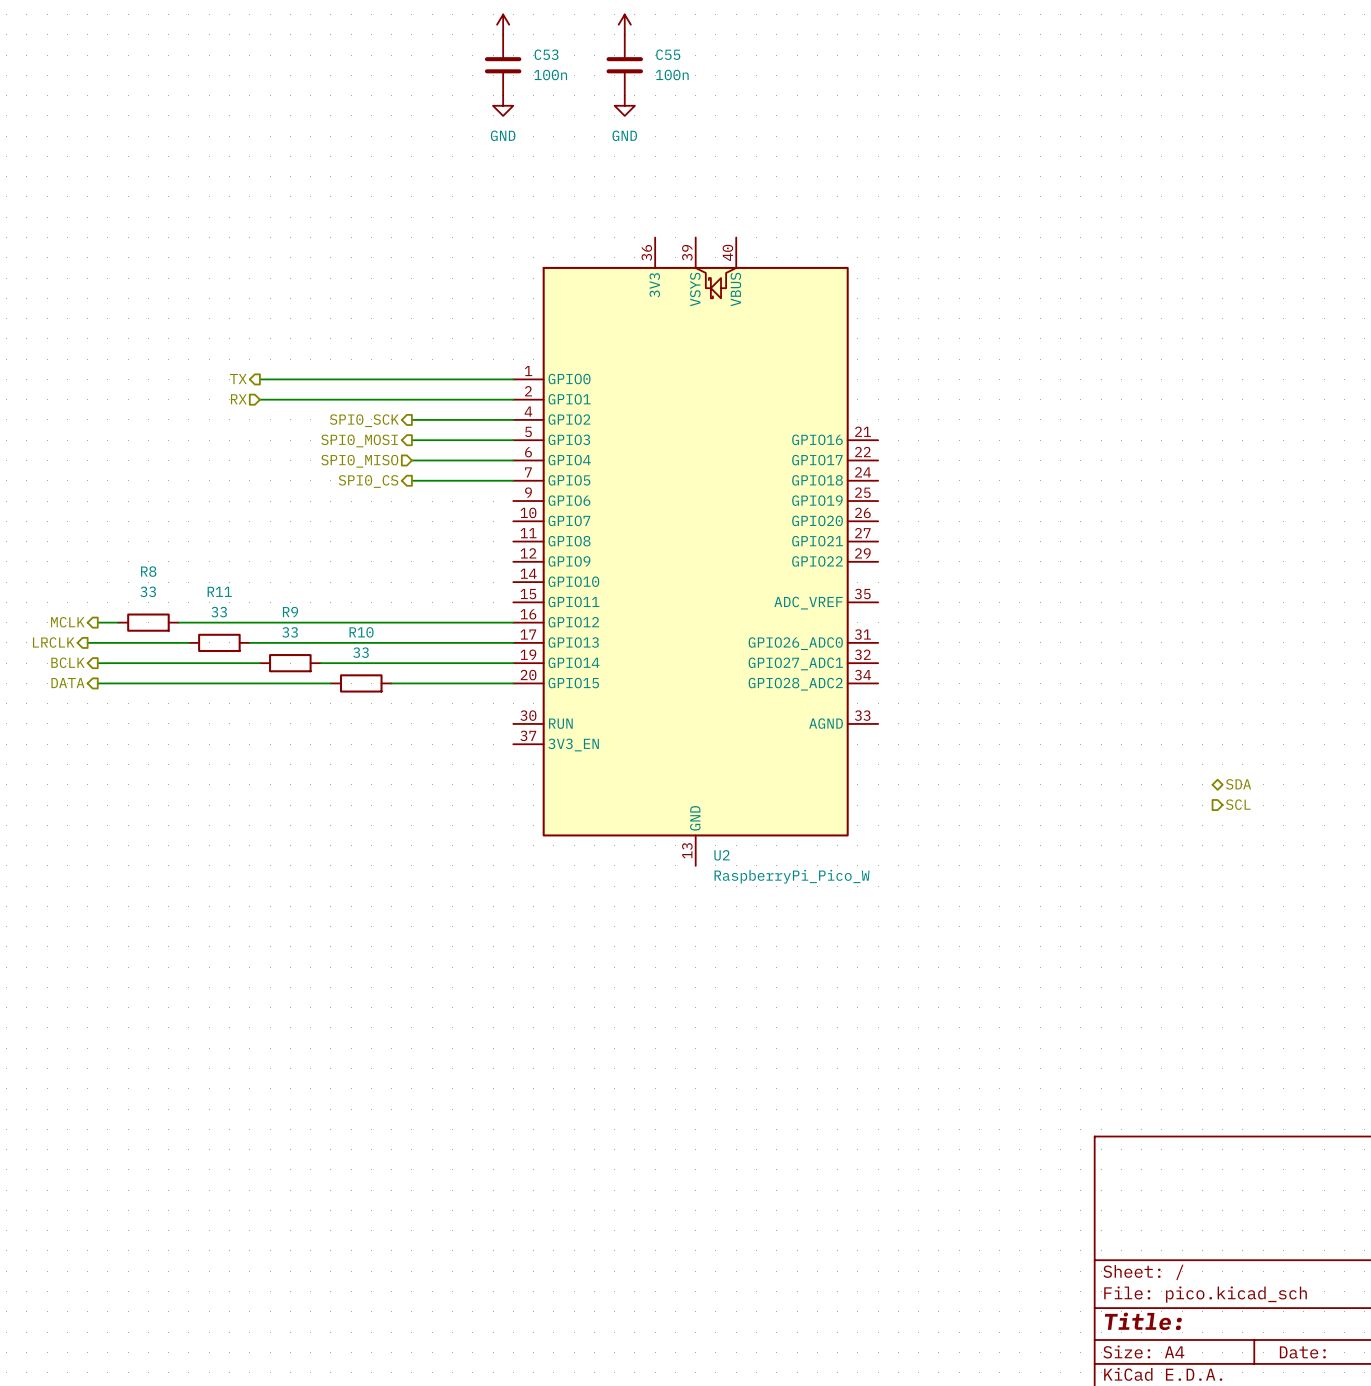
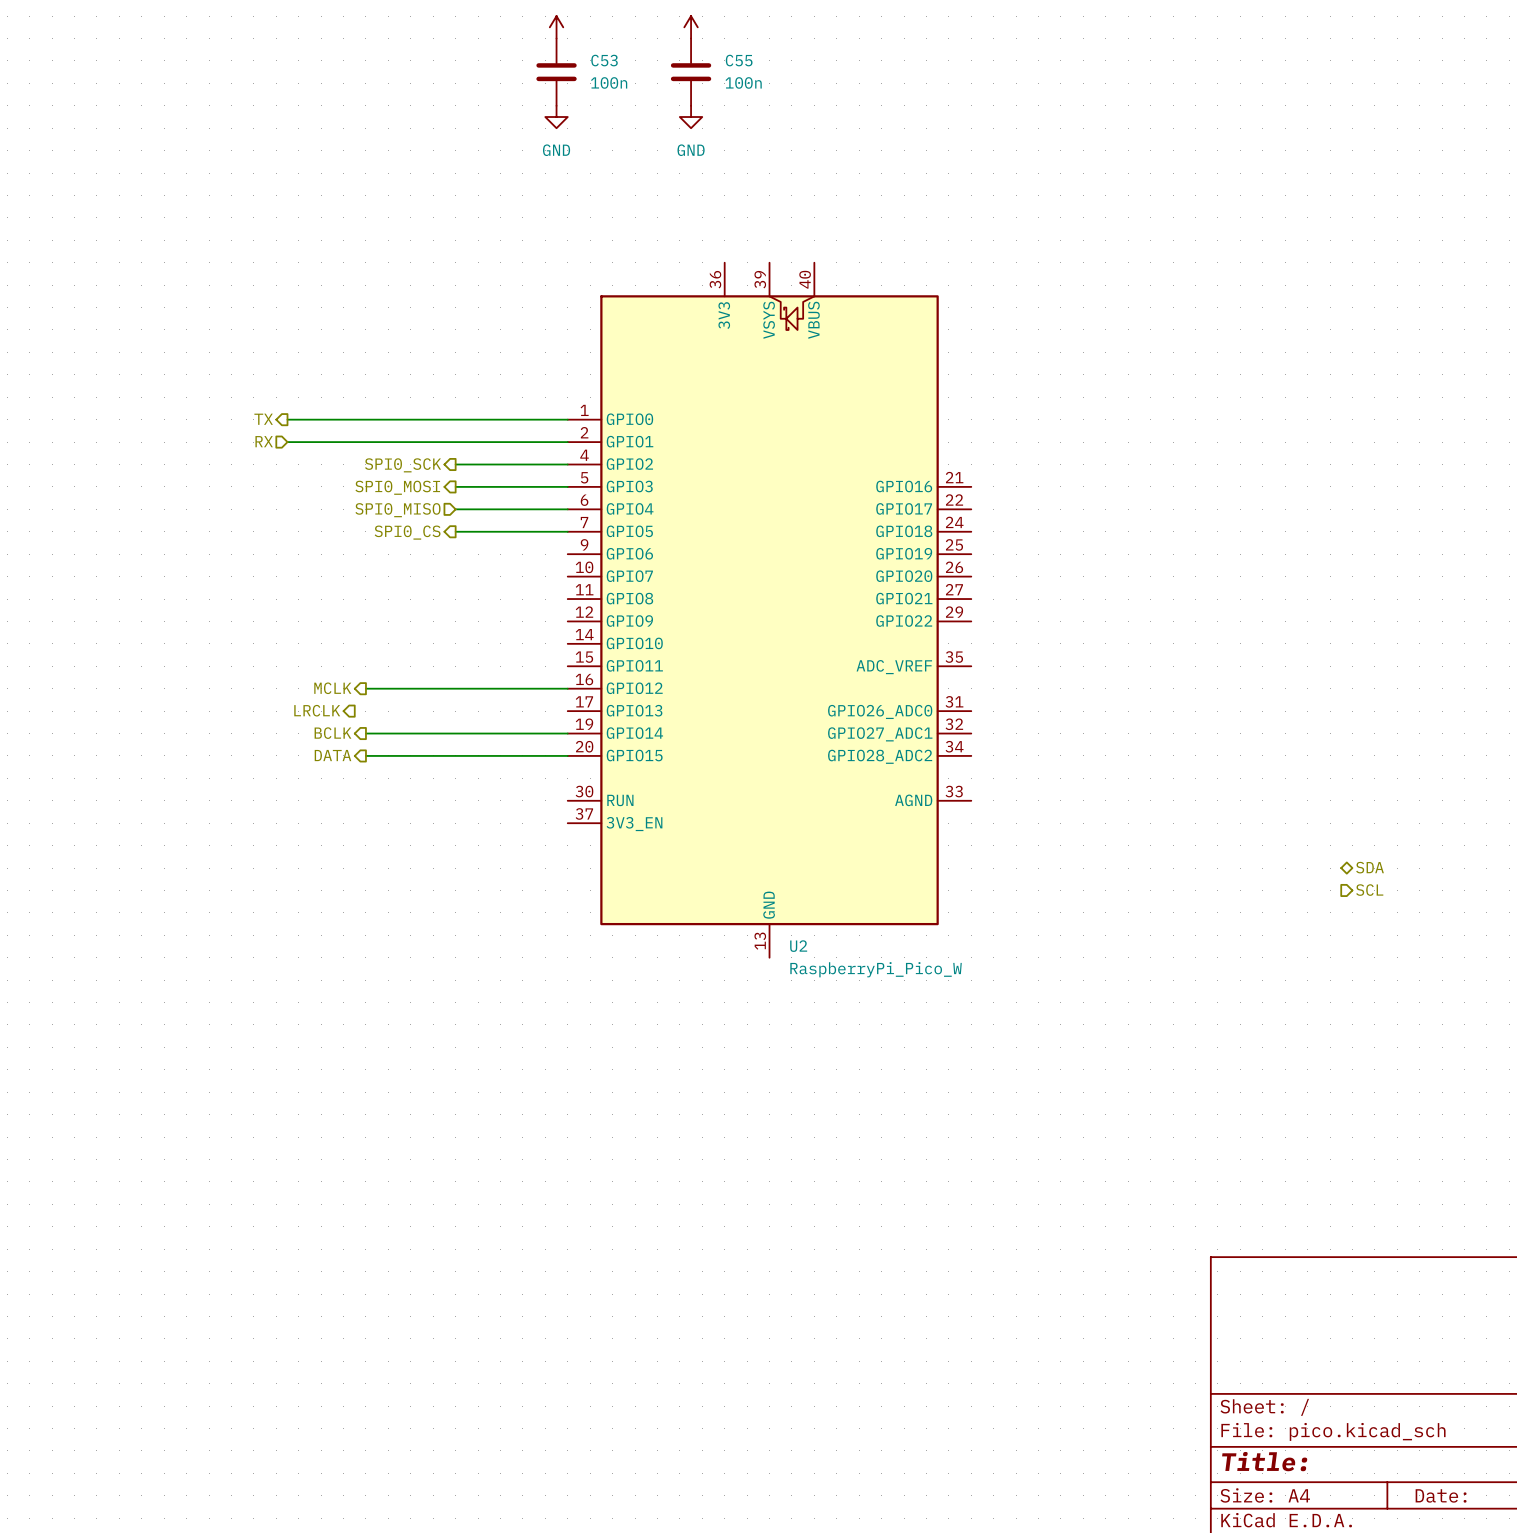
hierarchical label: MCLK (67, 622) -> none
wire: (97, 622) (118, 622) -> none
R8: 33 (148, 622) -> none
wire: (178, 622) (330, 622) -> none
hierarchical label: none -> MCLK (332, 688)
hierarchical label: LRCLK (53, 642) -> none
wire: (87, 642) (188, 642) -> none
R11: 33 (219, 642) -> none
wire: (249, 642) (513, 642) -> none
hierarchical label: none -> LRCLK (317, 710)
hierarchical label: BCLK (67, 662) -> none
hierarchical label: none -> BCLK (332, 733)
wire: (97, 663) (259, 663) -> none
R9: 33 (290, 663) -> none
wire: (320, 663) (330, 663) -> none
hierarchical label: DATA (67, 683) -> none
wire: (97, 683) (330, 683) -> (433, 755) (365, 755)
hierarchical label: none -> DATA (332, 755)
R10: 33 (361, 683) -> none

